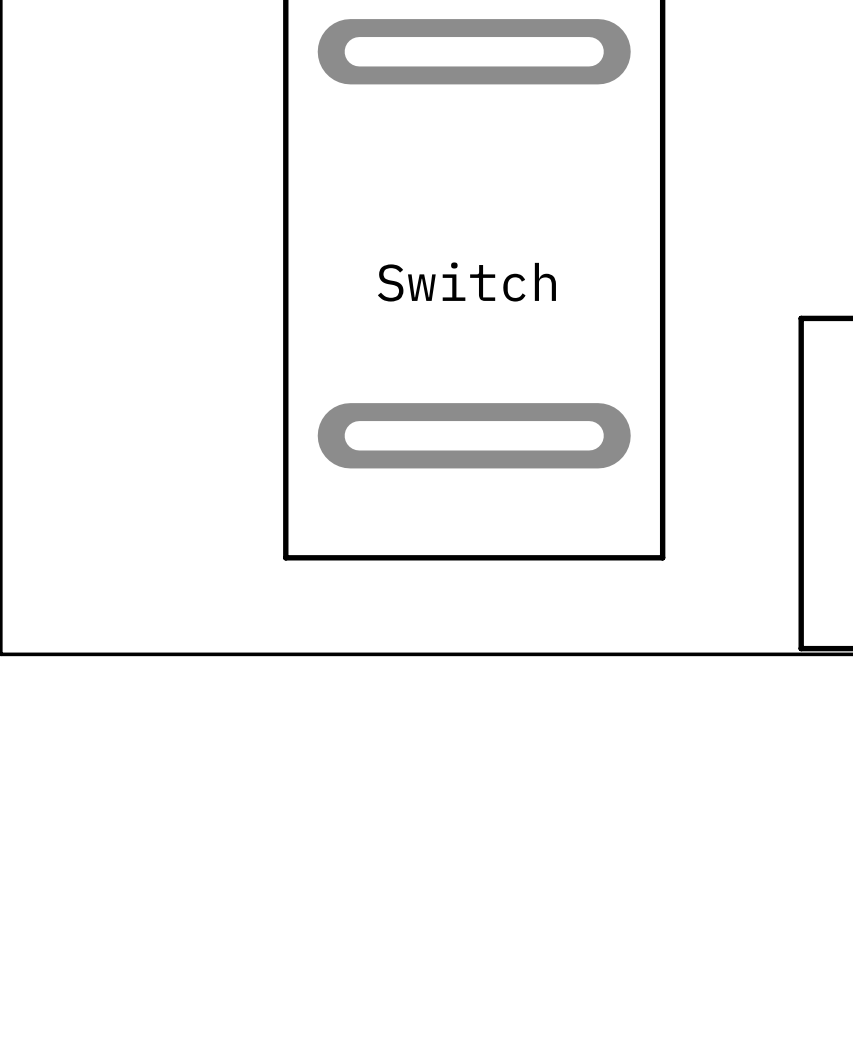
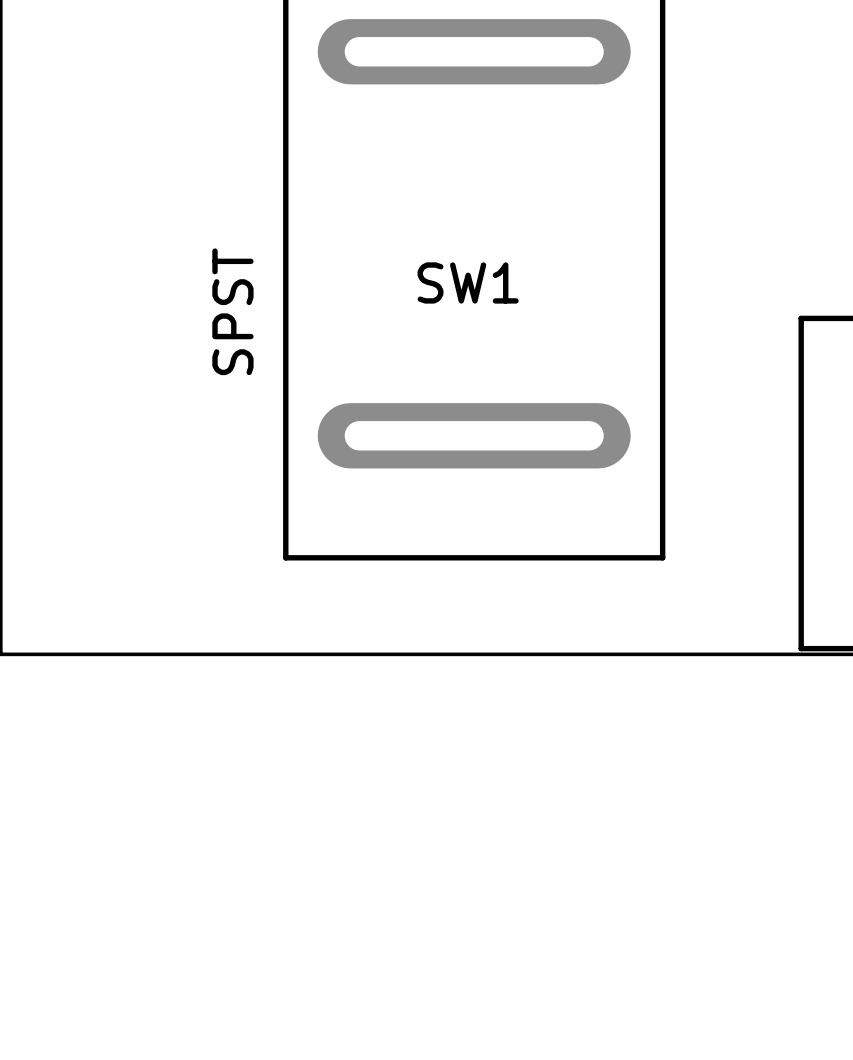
Switch name: Switch (466, 282) -> SW1 (468, 282)
Switch value: none -> SPST (232, 311)

